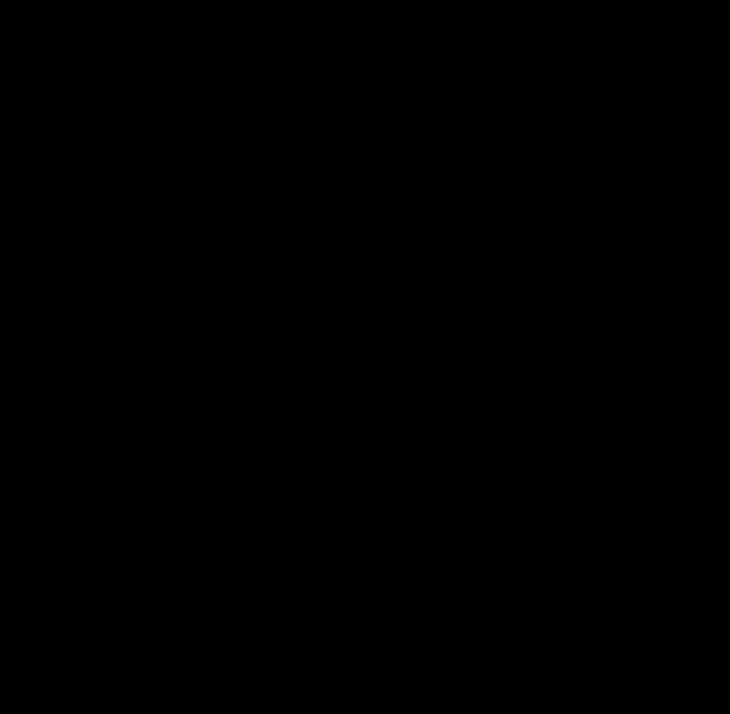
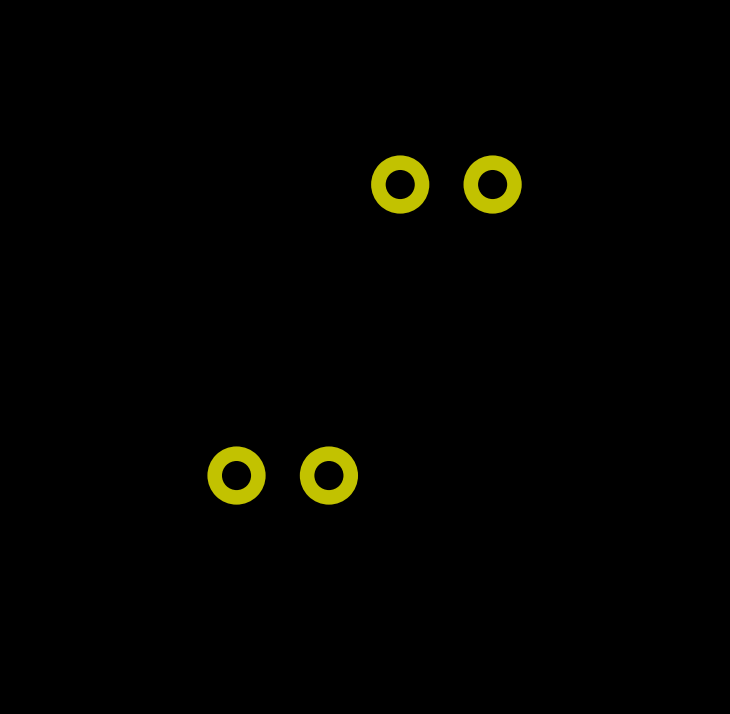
part: none -> (446, 184)
part: none -> (282, 475)

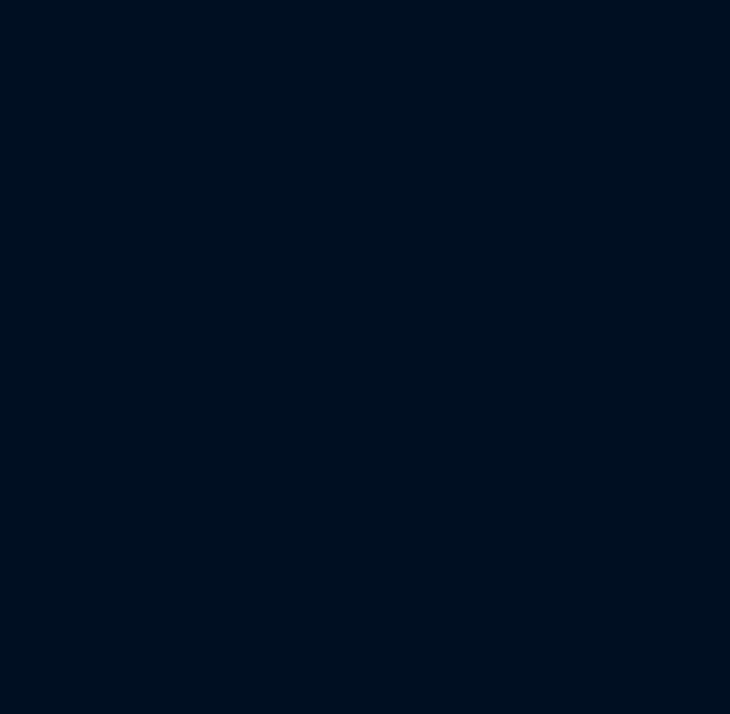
part: (446, 184) -> none
part: (282, 475) -> none

